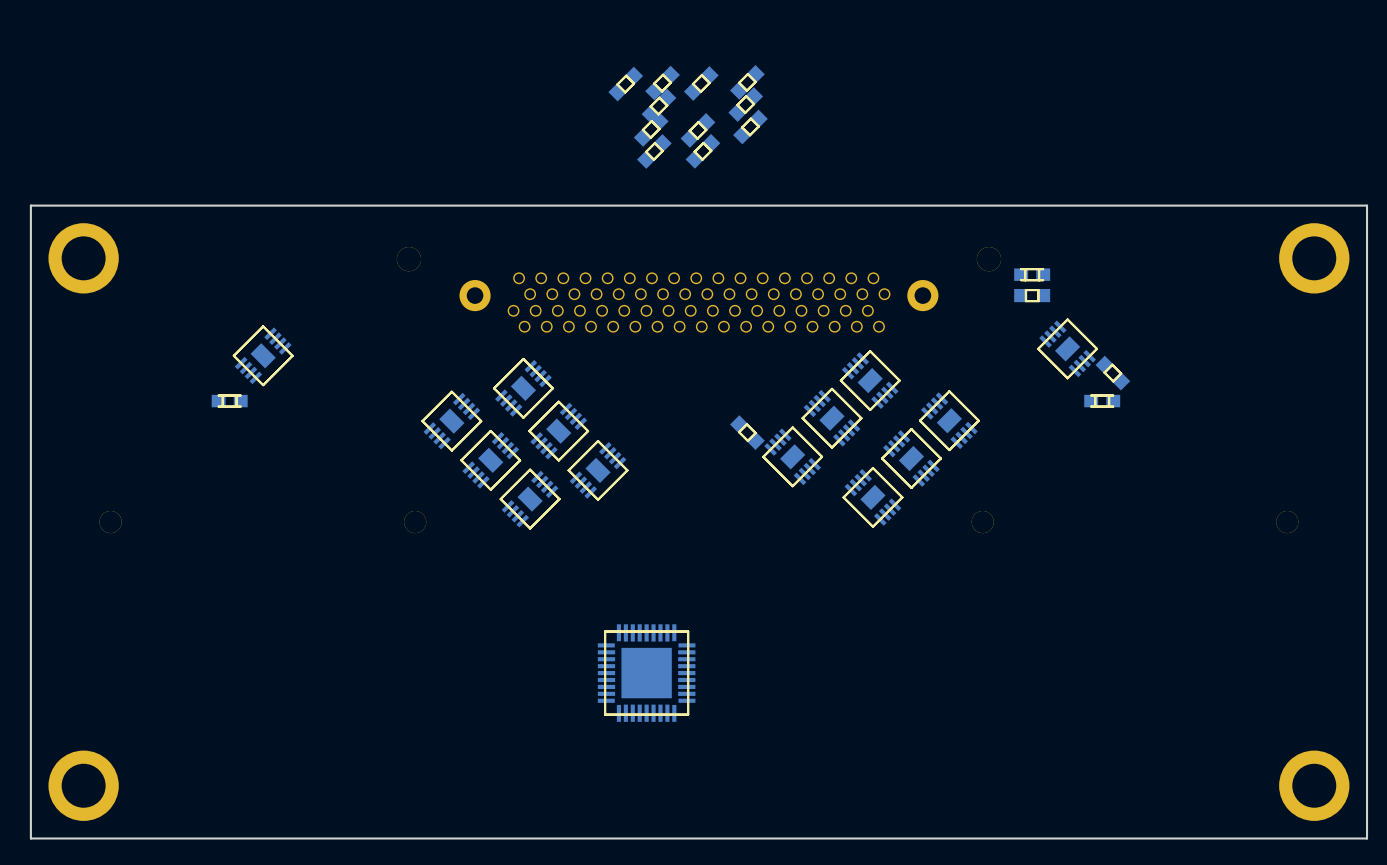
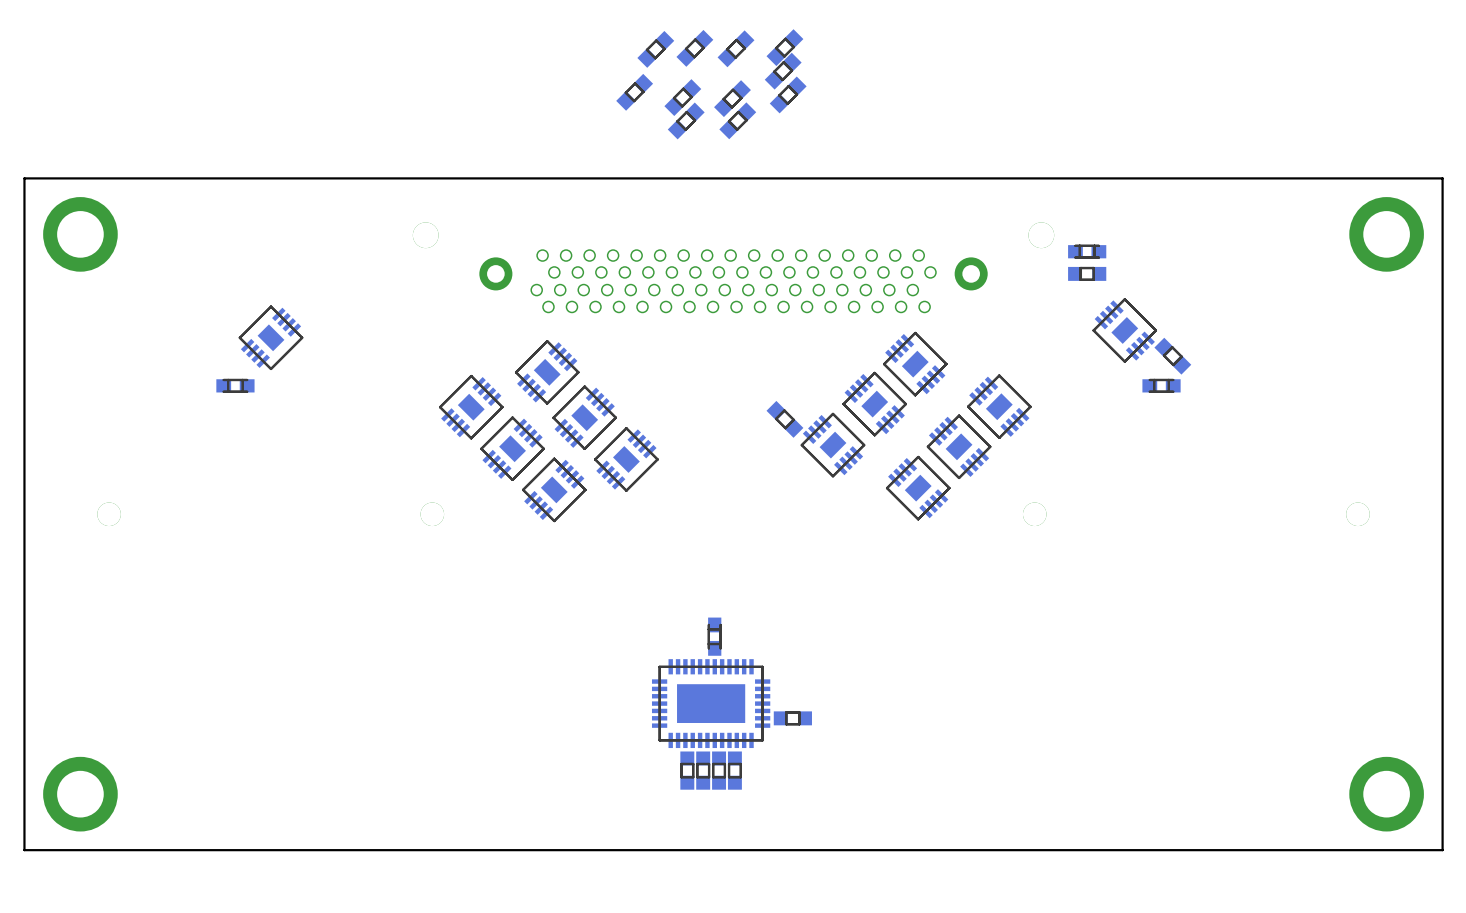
part position: (658, 106) -> (634, 92)
part: none -> (714, 636)
part: (646, 673) -> none
part: none -> (711, 703)
part: none -> (792, 718)
part: none -> (687, 770)
part: none -> (703, 770)
part: none -> (719, 770)
part: none -> (734, 770)

